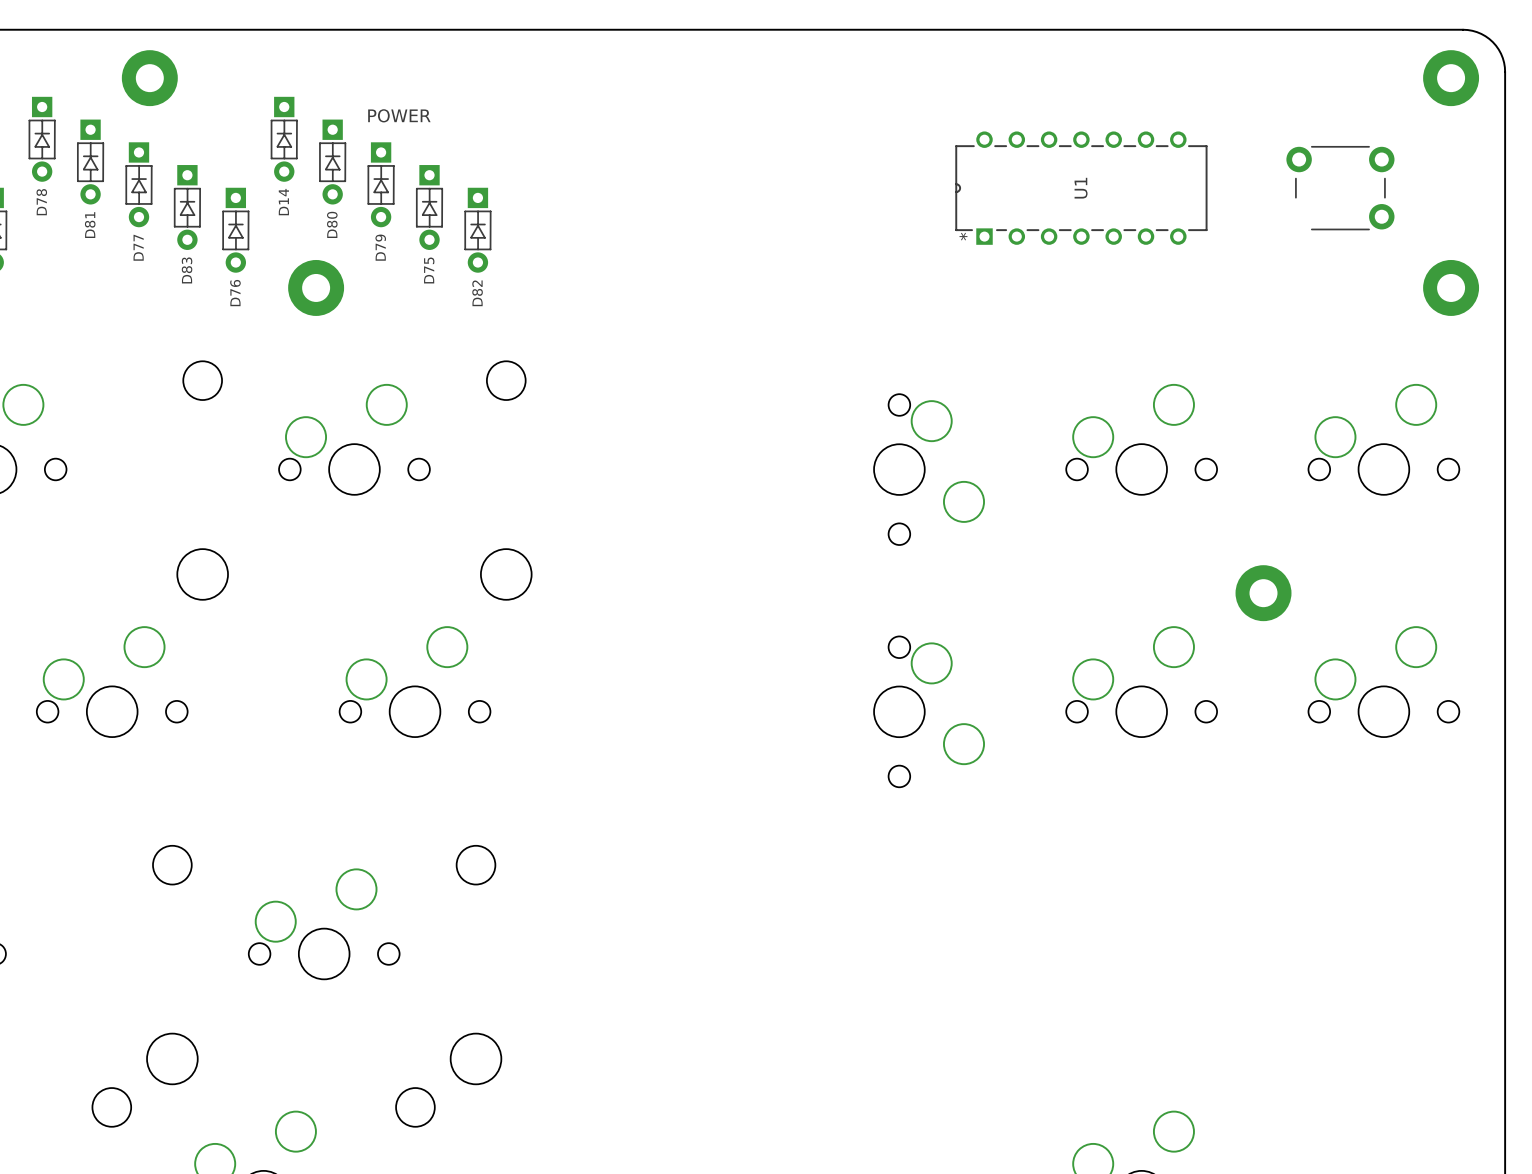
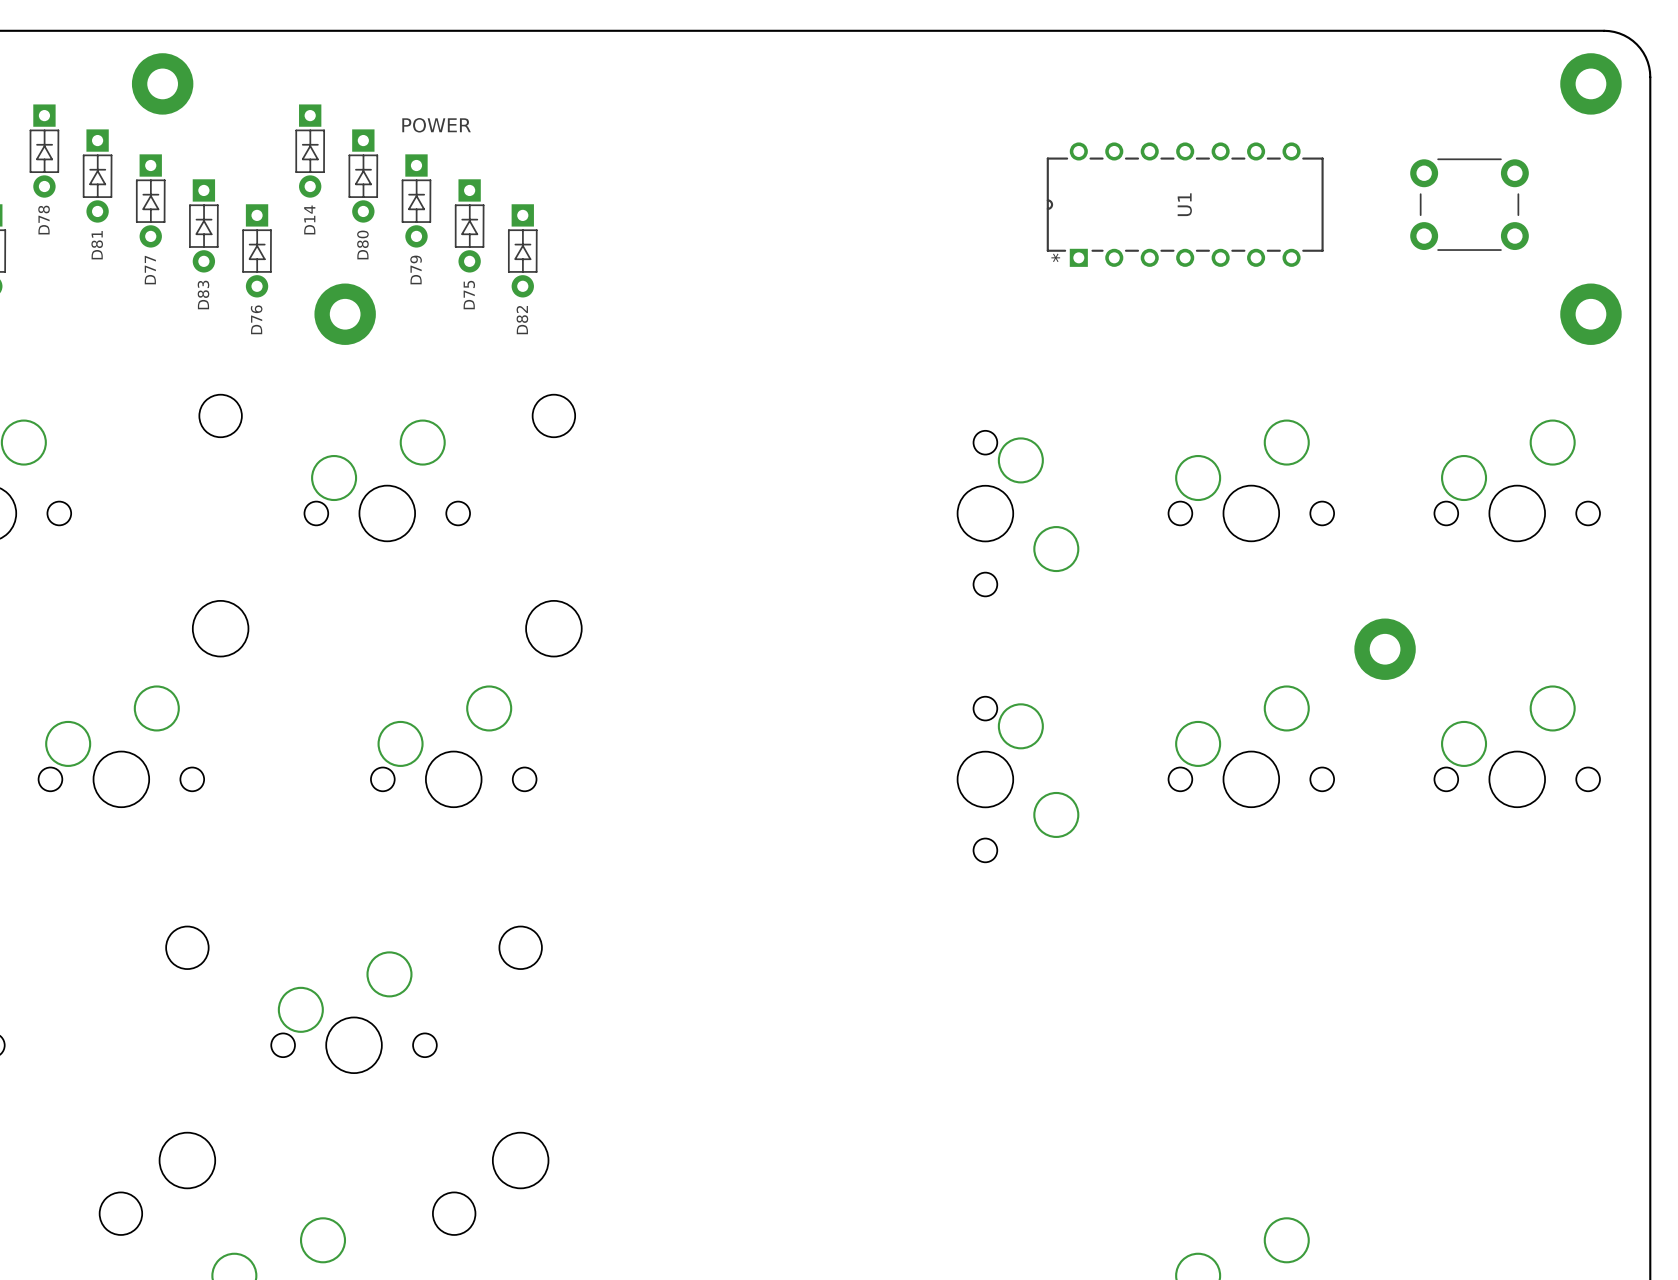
part footprint: [1286, 146, 1395, 231] -> [1410, 158, 1529, 251]

